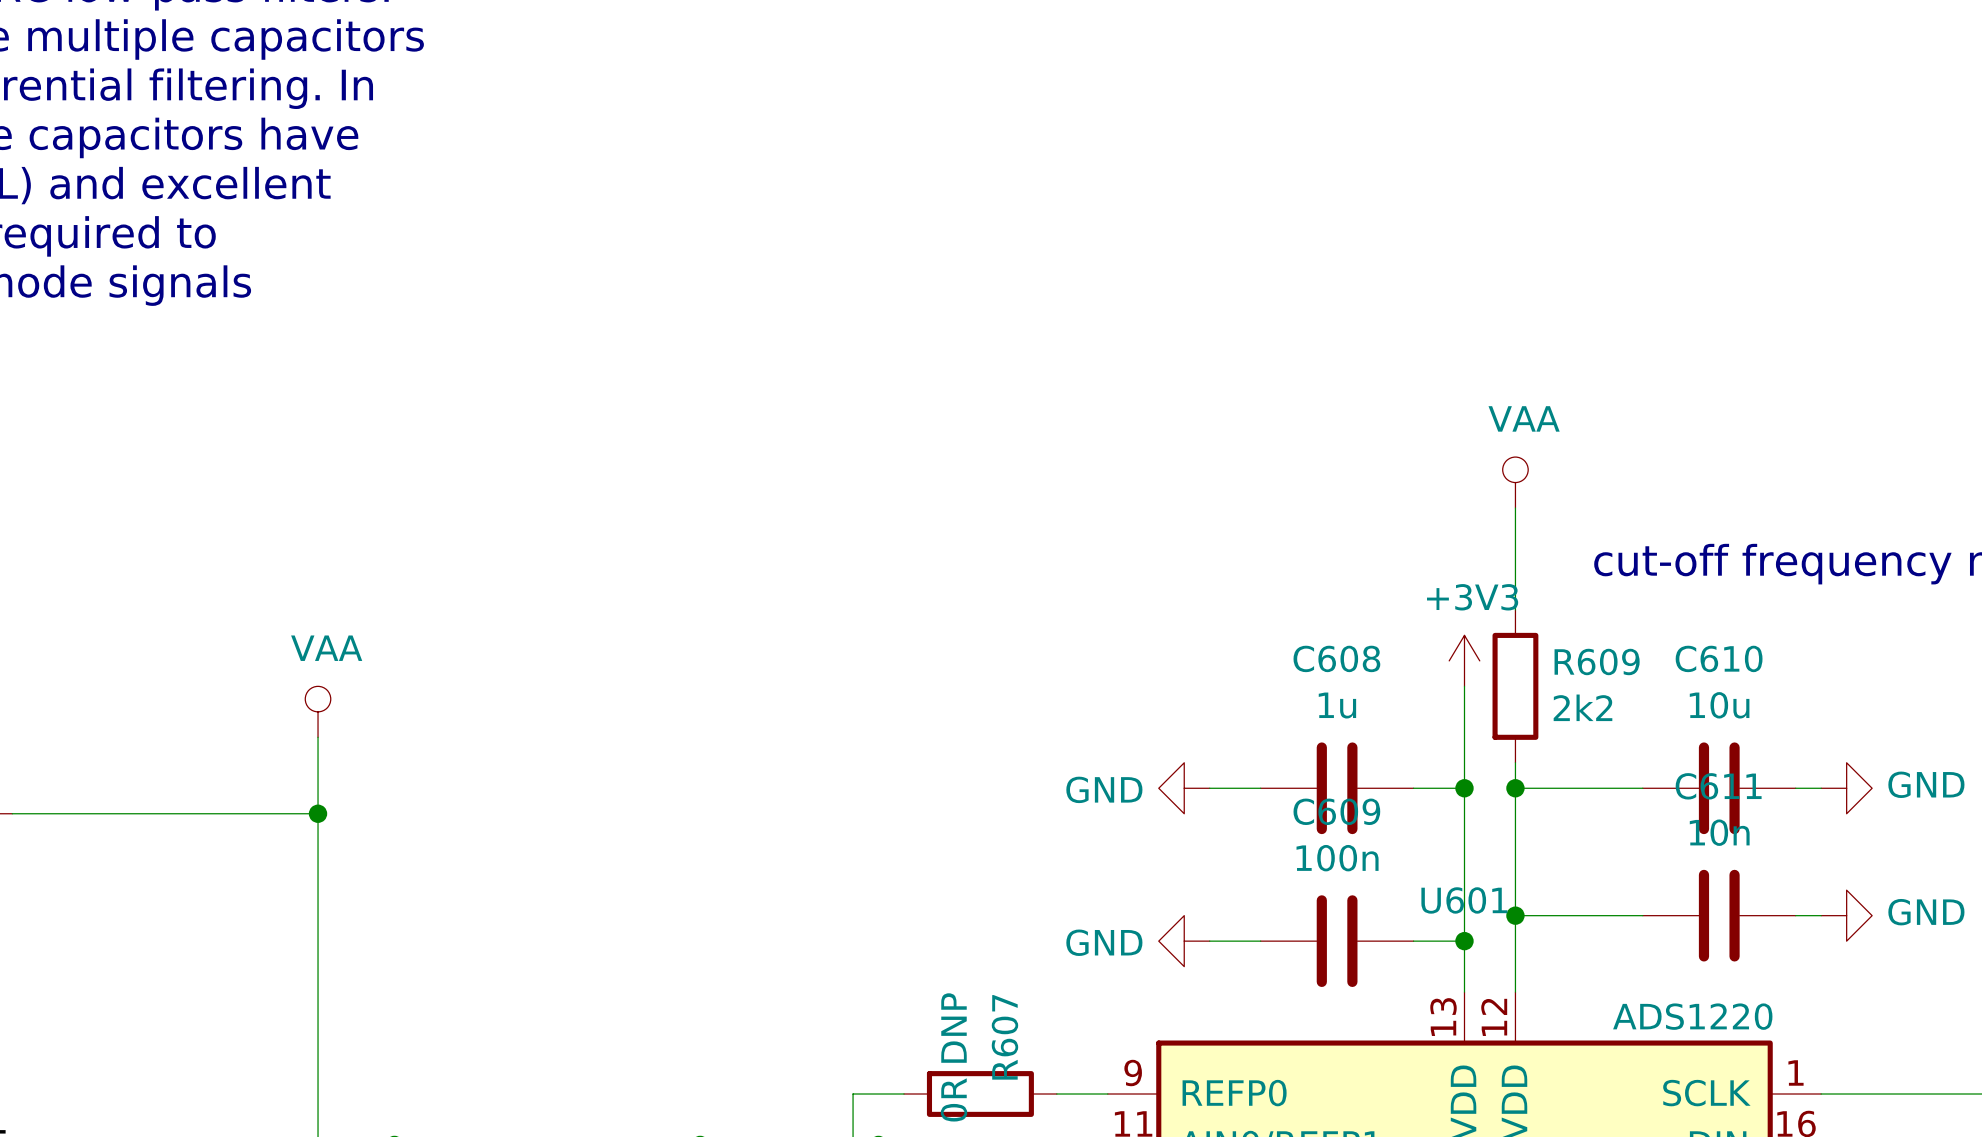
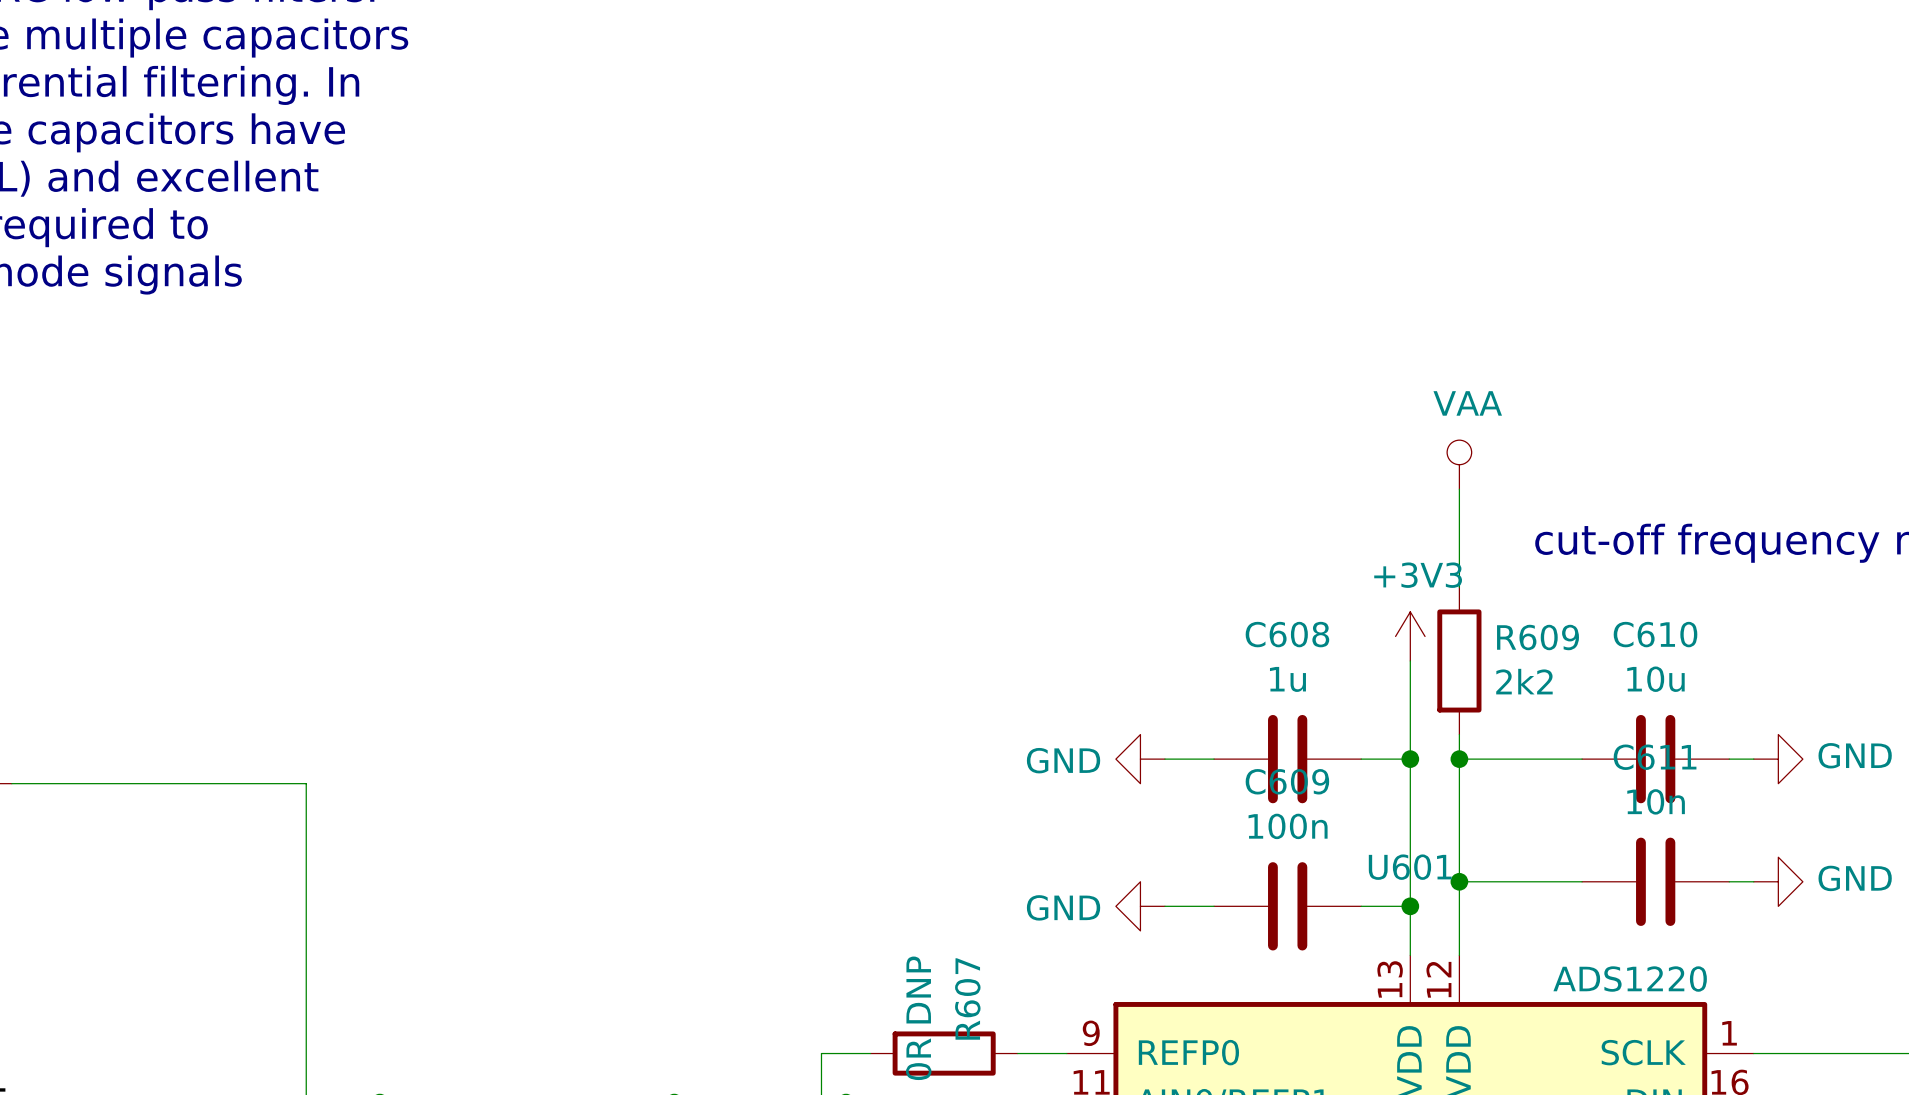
power symbol: VAA (318, 711) -> none
wire: (318, 737) (318, 813) -> none
junction: (318, 813) -> none

